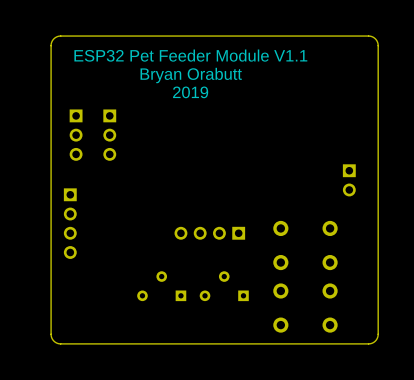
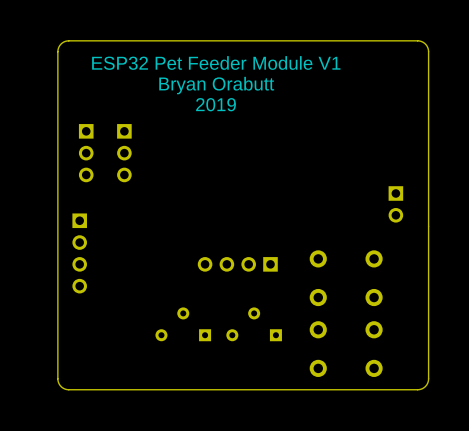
text: ESP32 Pet Feeder Module V1.1 (190, 55) -> ESP32 Pet Feeder Module V1 (216, 62)

